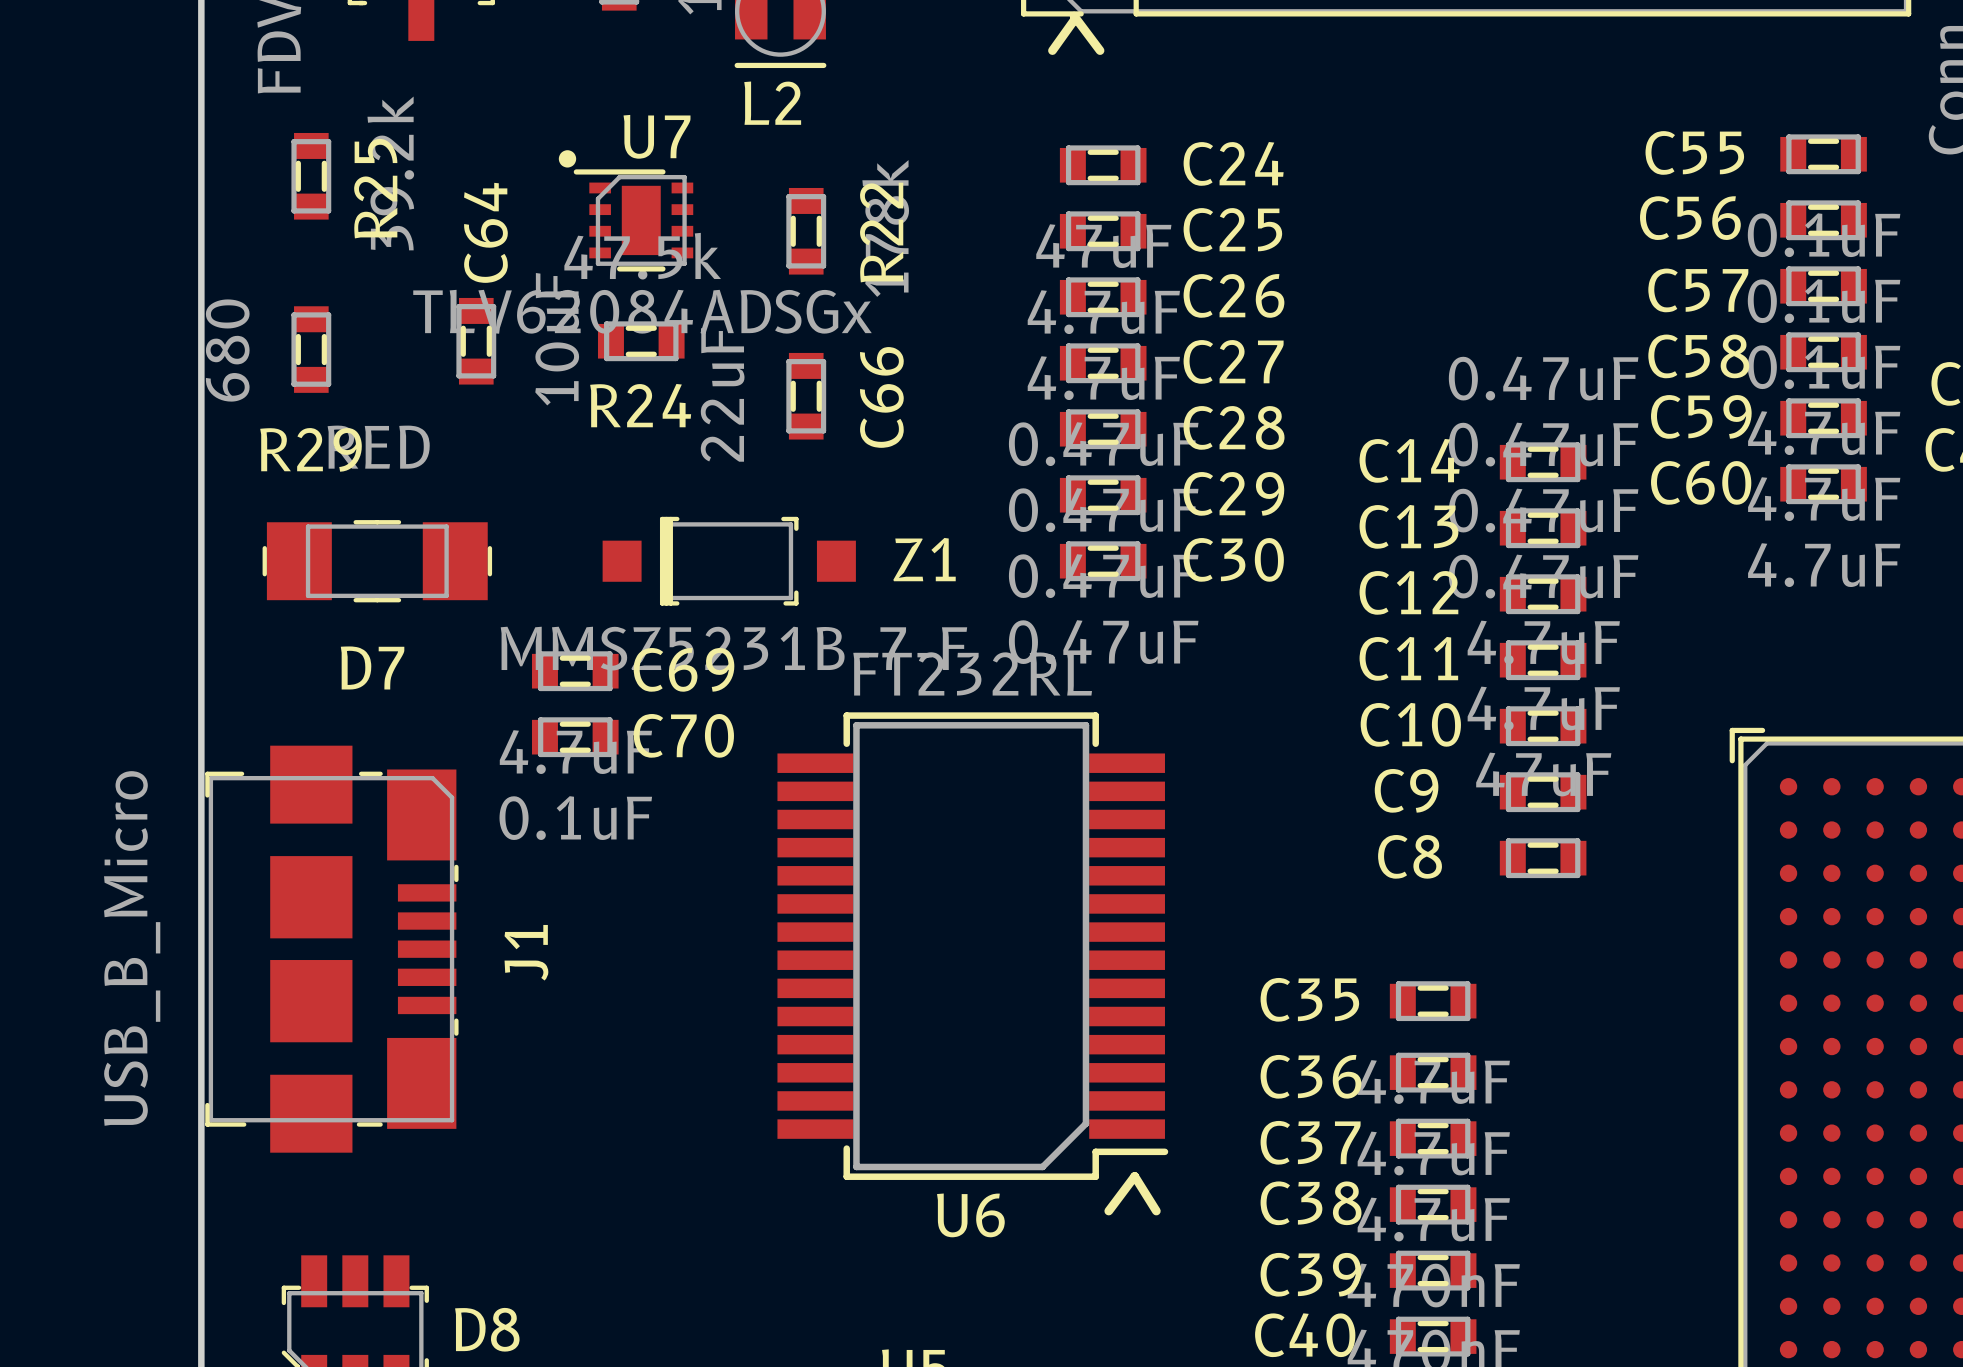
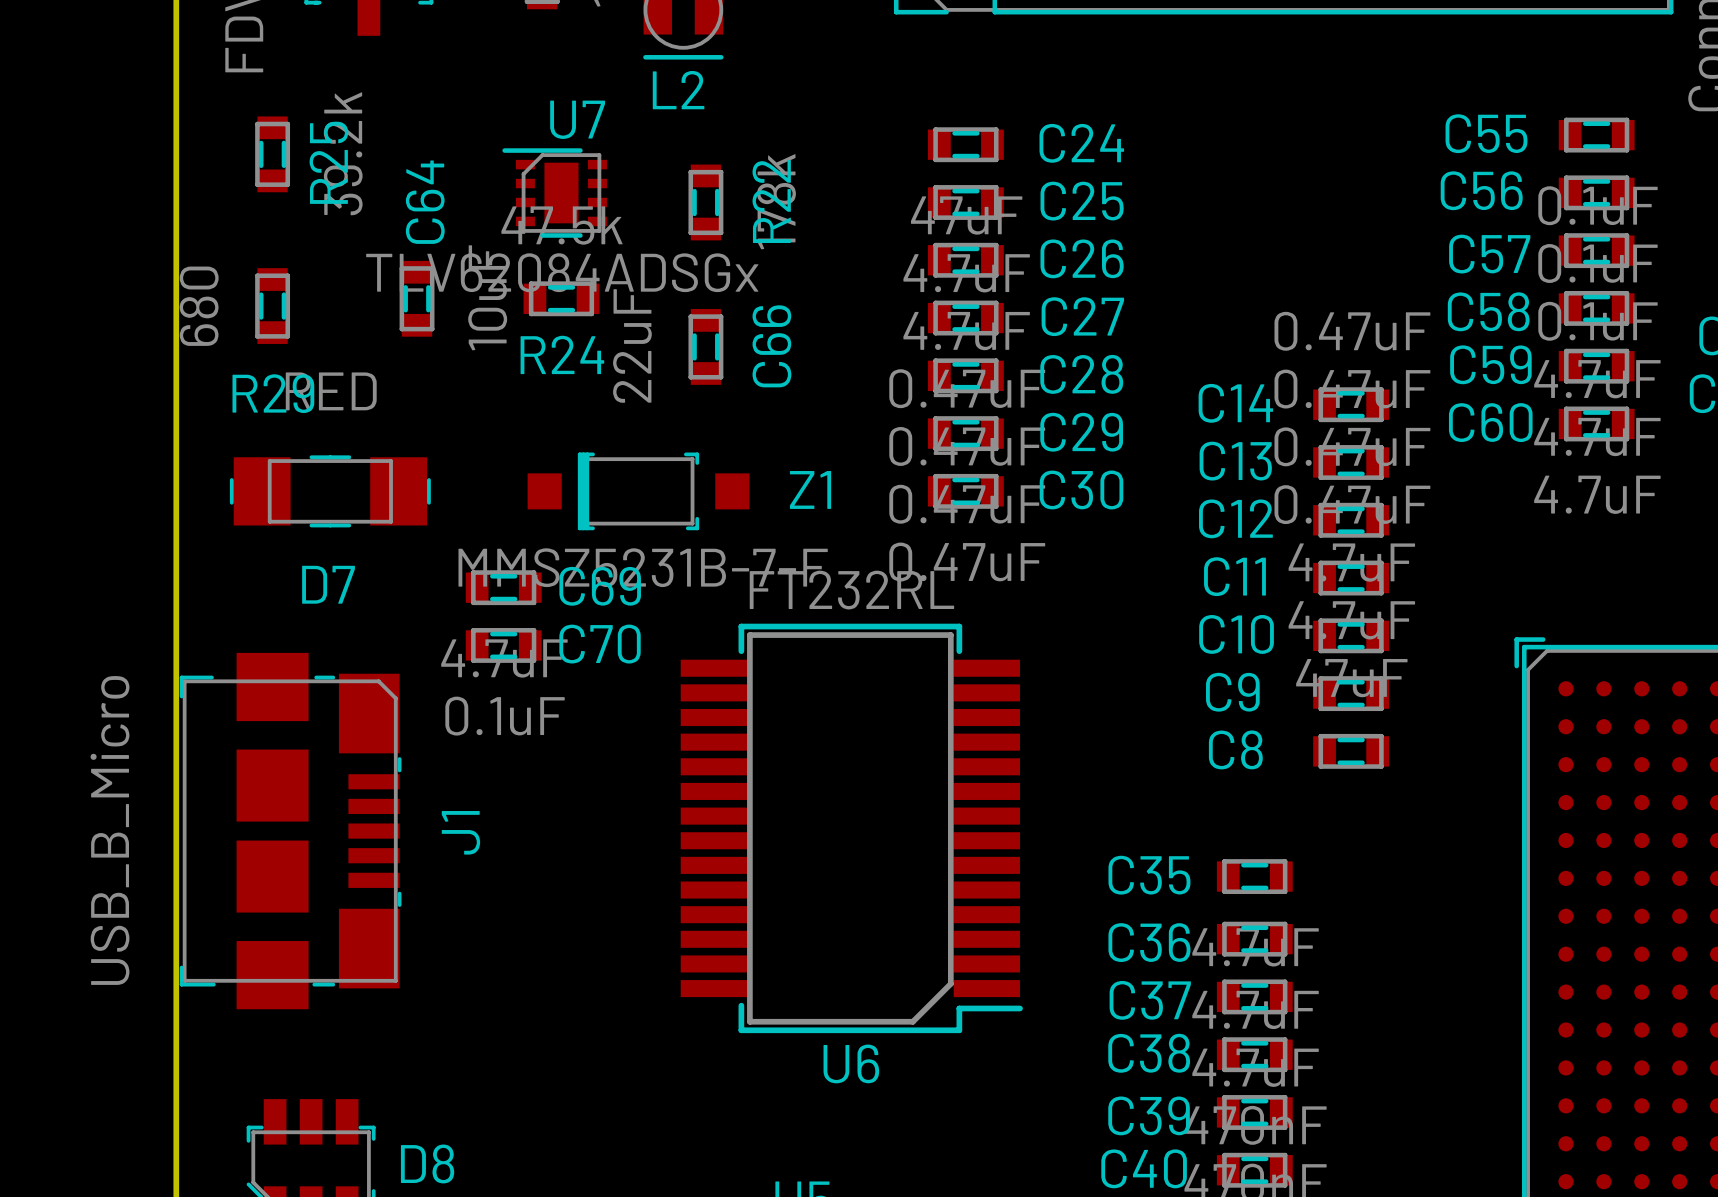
line: (1074, 15) (1100, 50) -> none
line: (1074, 20) (1052, 50) -> none
drawing: [558, 150, 577, 168] -> none
line: (1108, 1211) (1134, 1176) (1156, 1211) -> none

